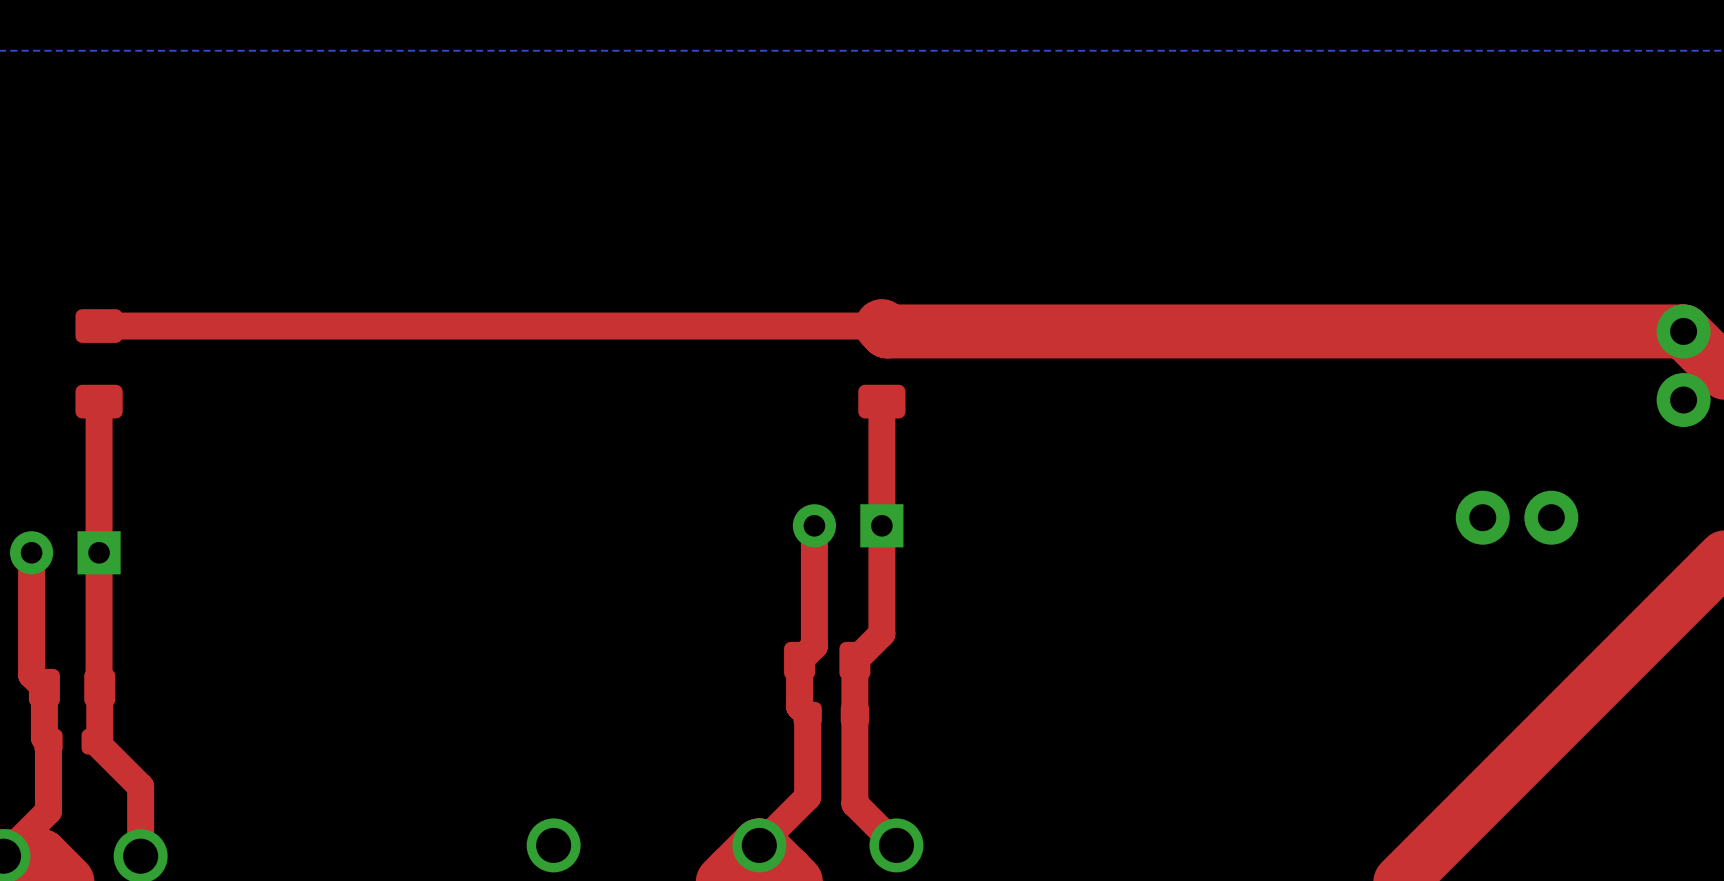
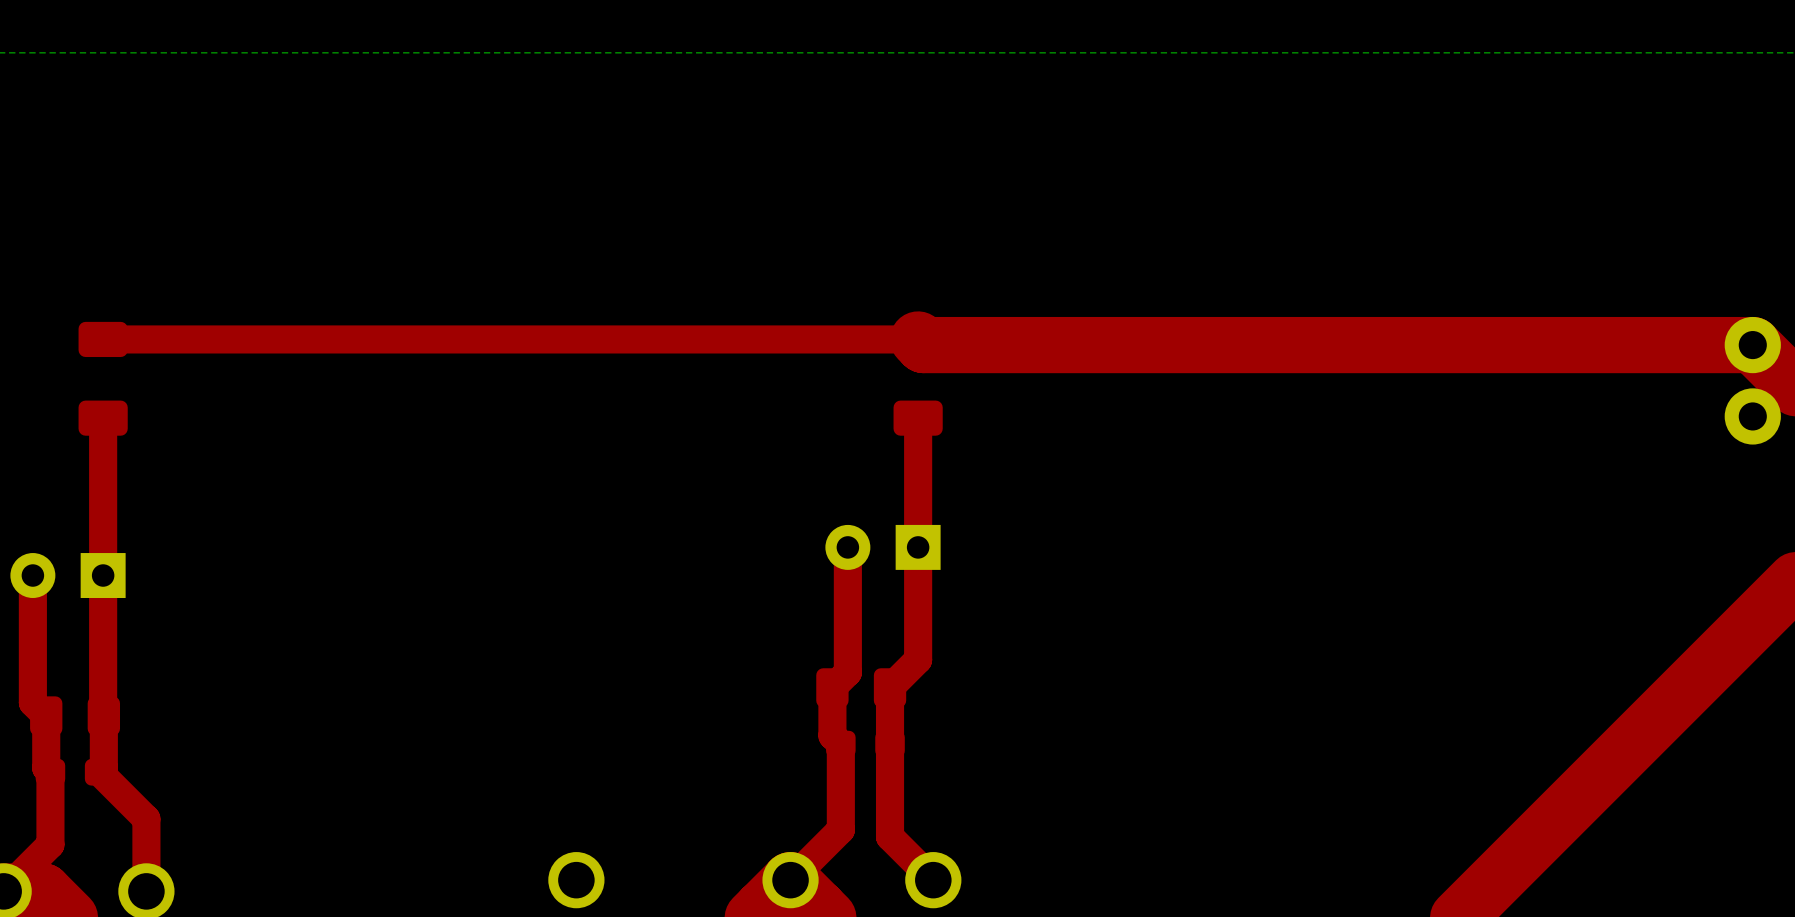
part: (1517, 517) -> none

